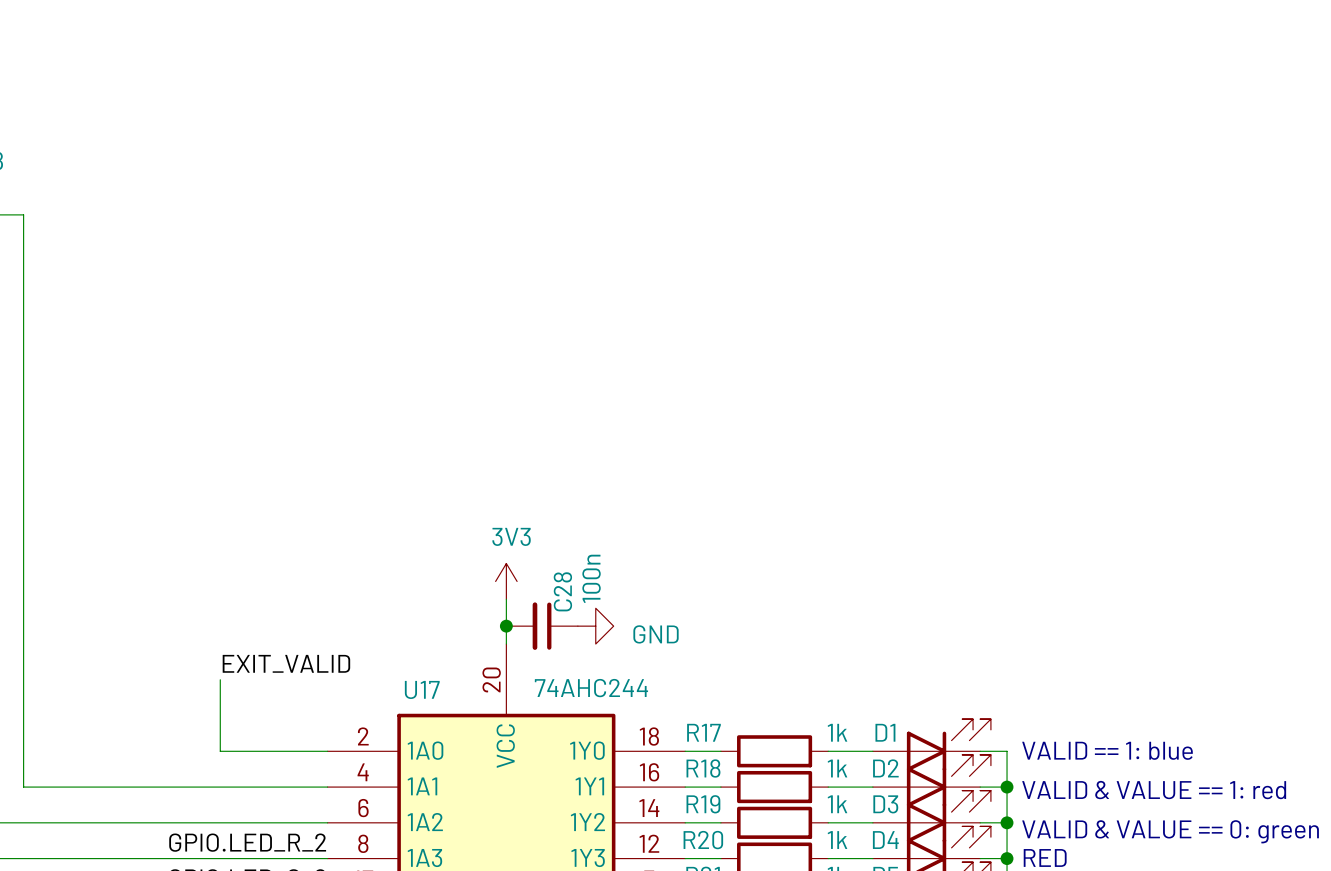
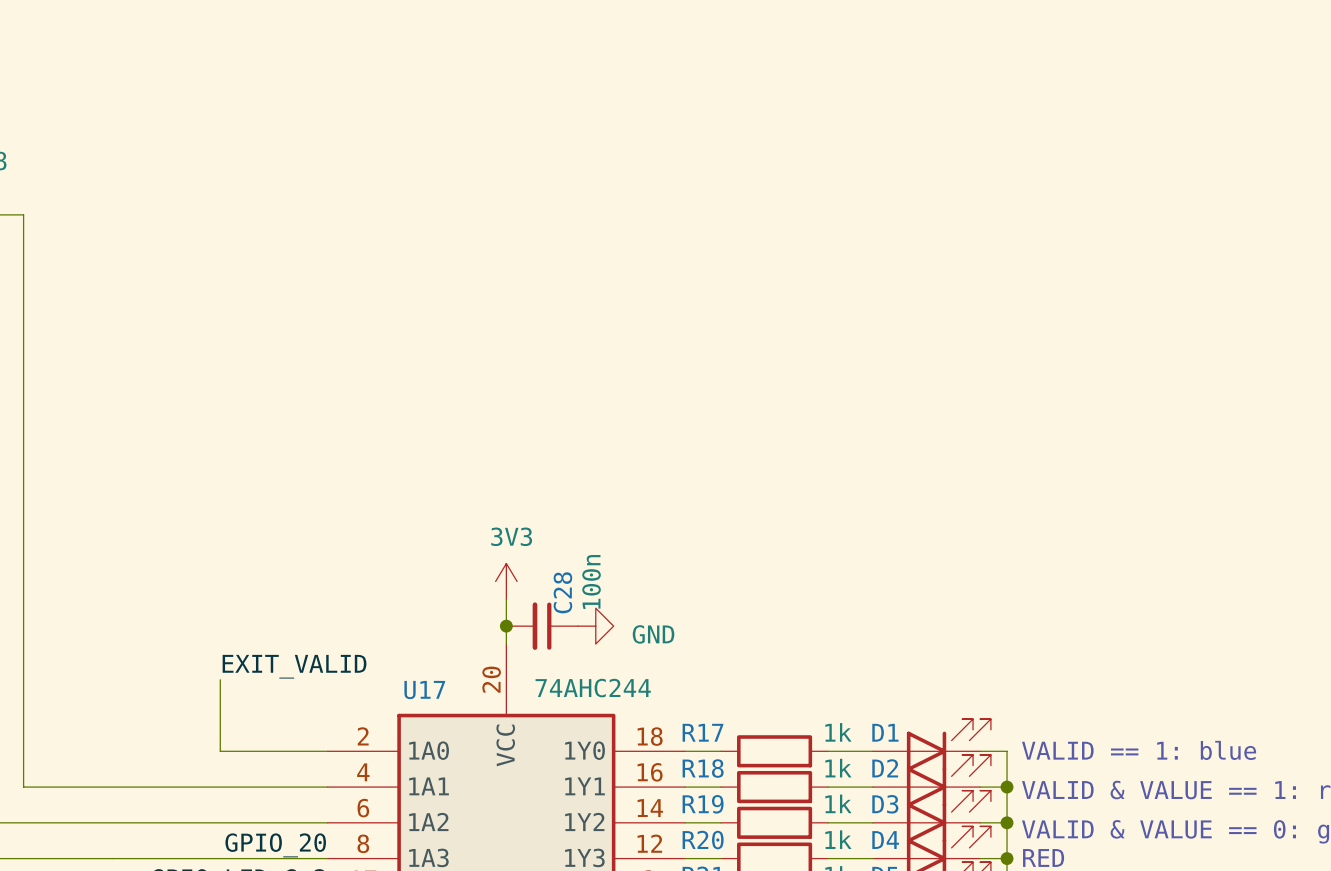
label: GPIO.LED_R_2 (247, 842) -> GPIO_20 (275, 845)

